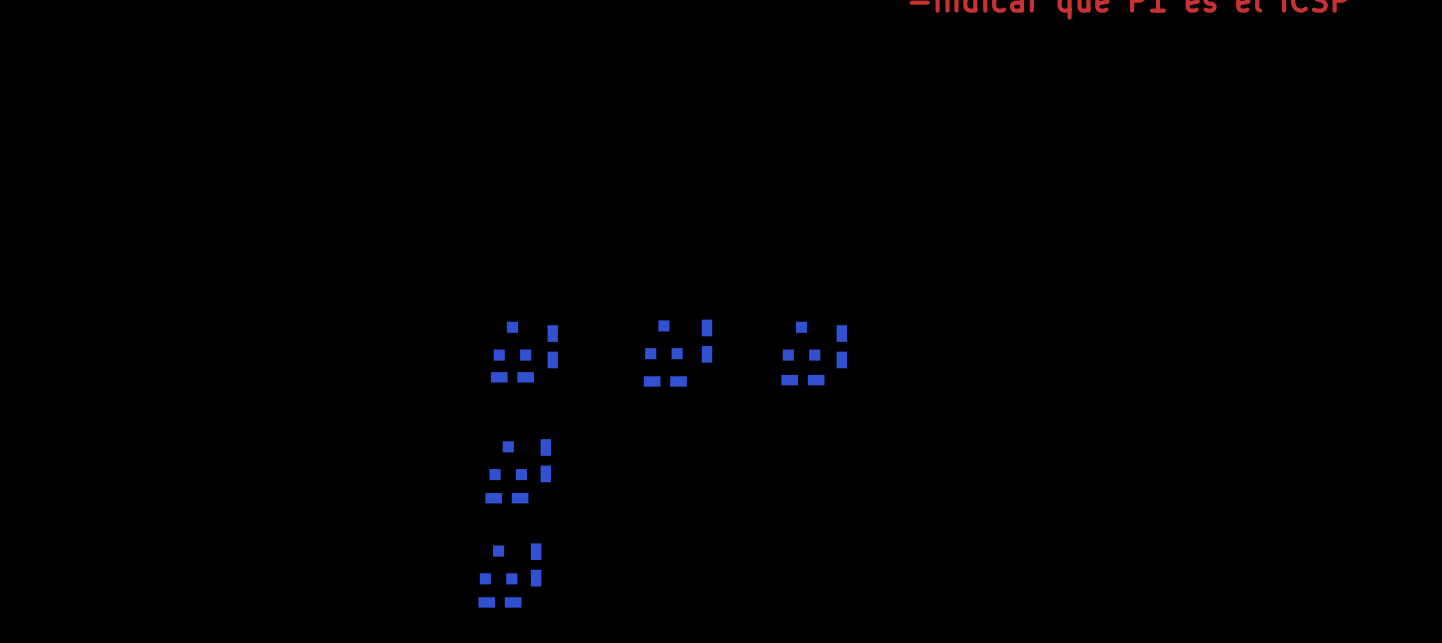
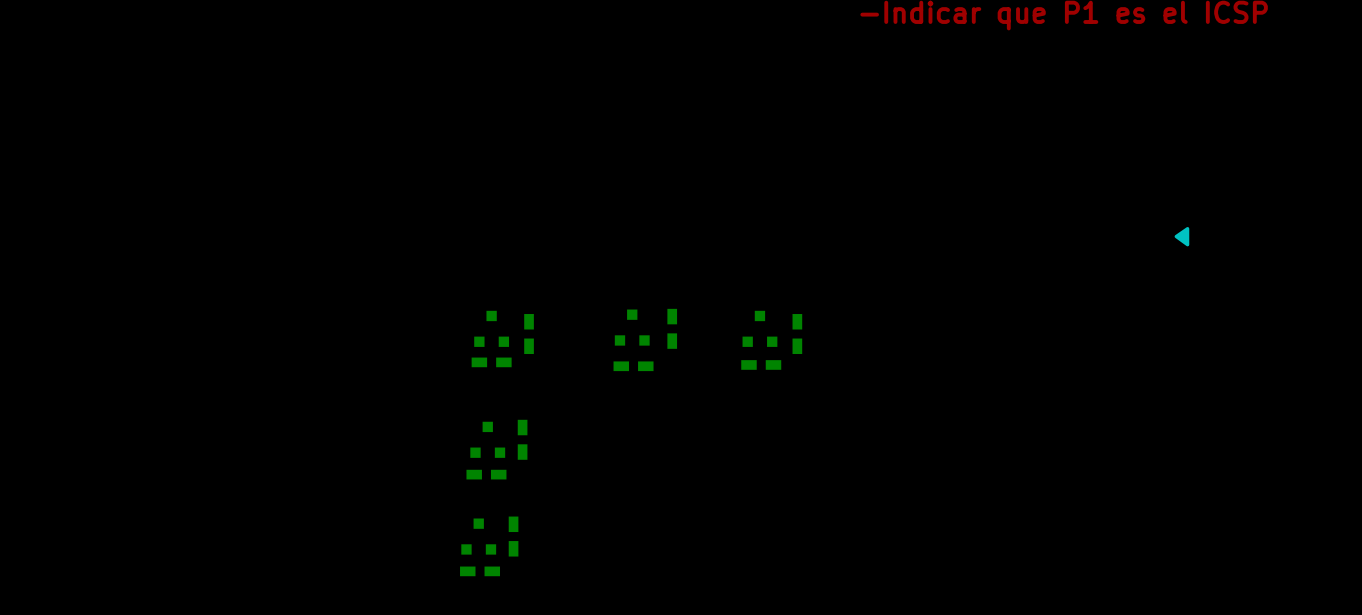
drawing: none -> [1174, 227, 1190, 247]

